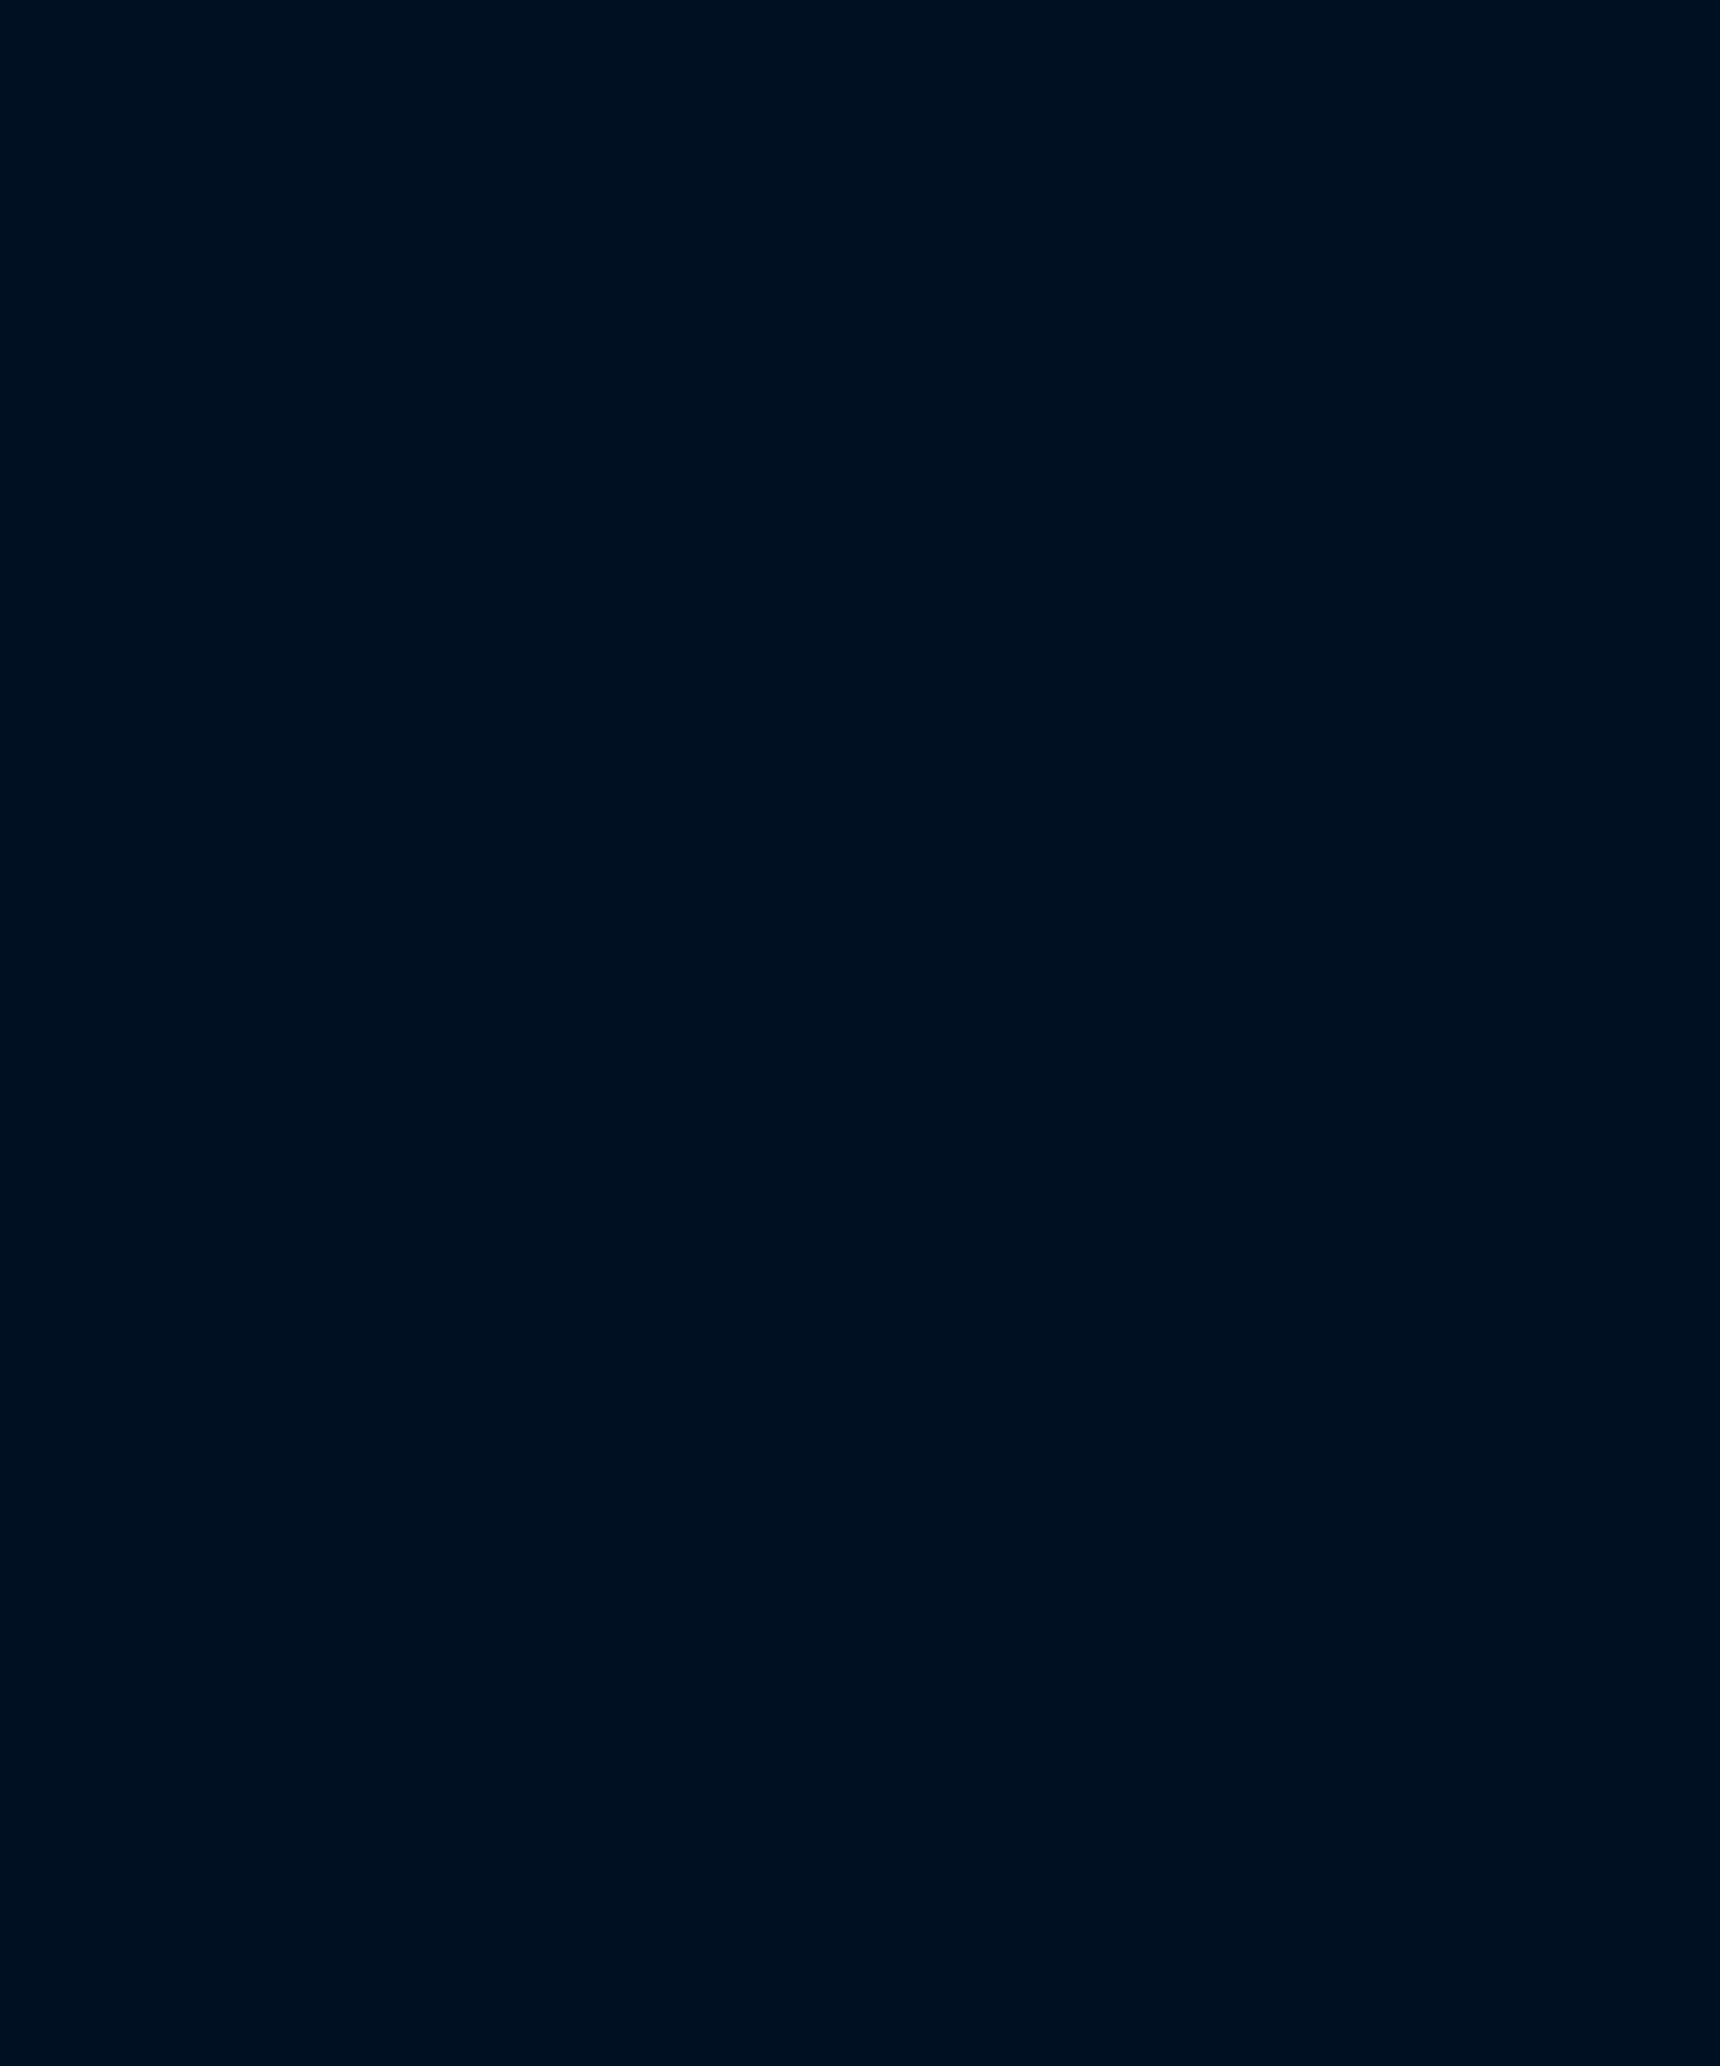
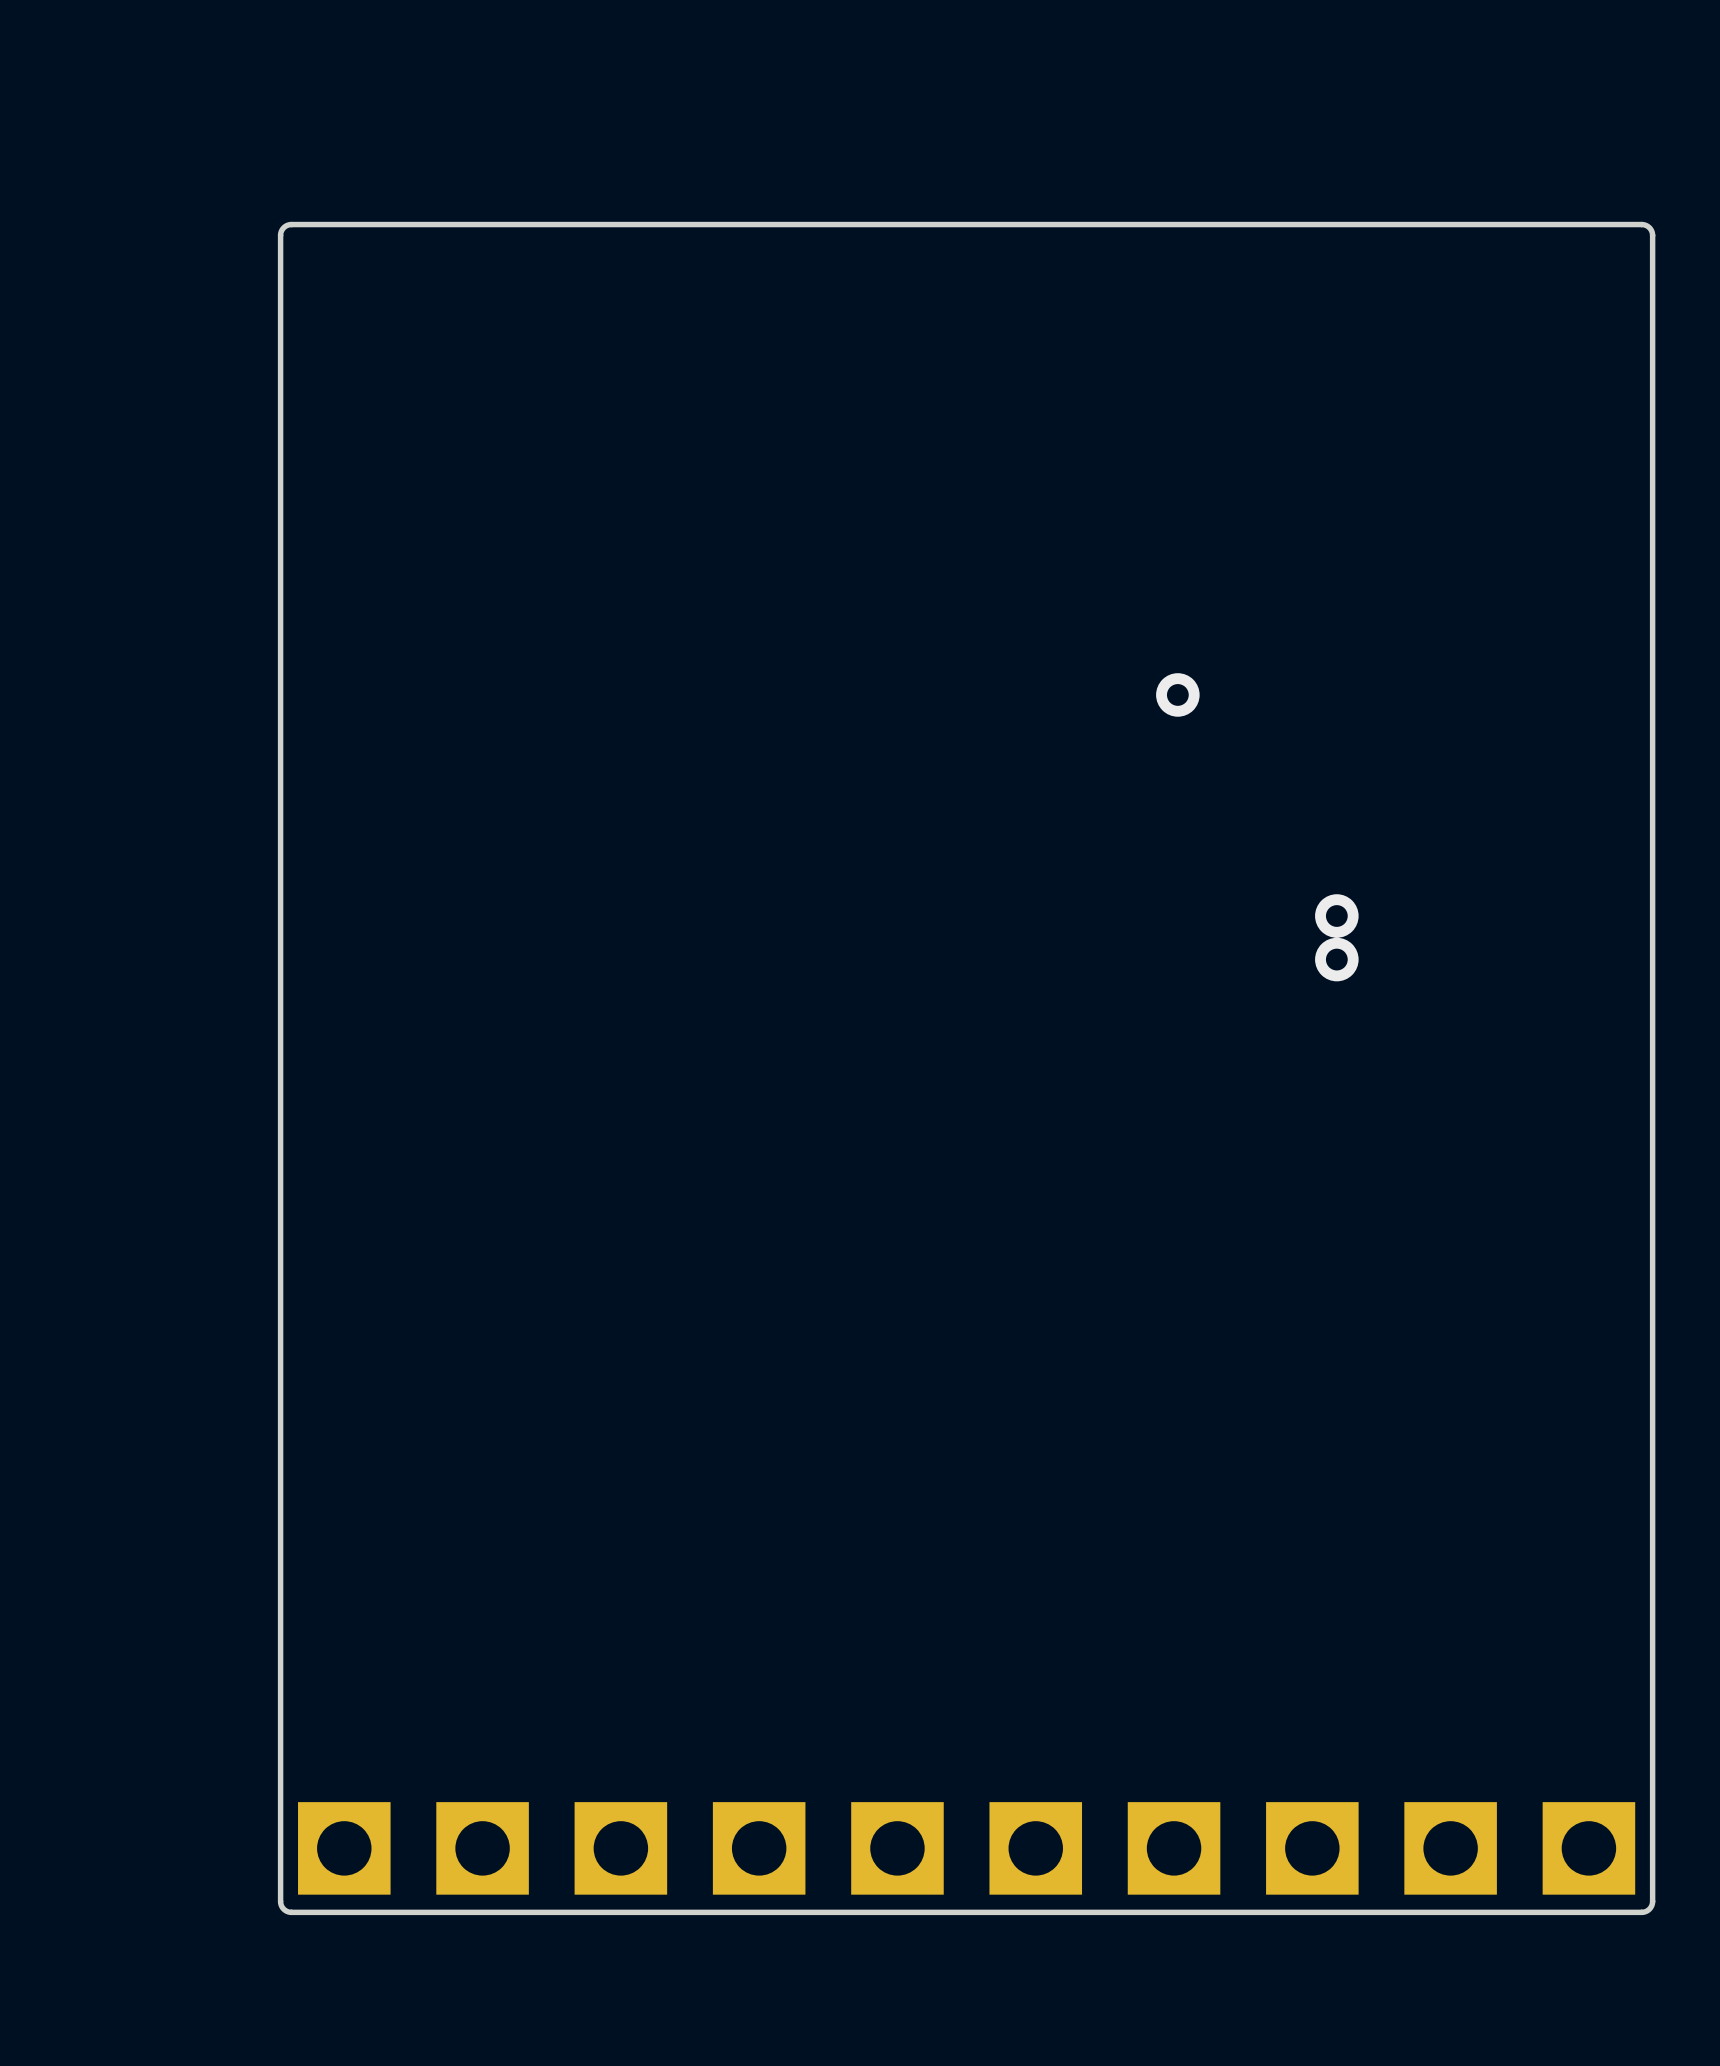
board edge: none -> (1641, 224) (291, 224) (282, 228) (280, 235) (280, 1901) (284, 1910) (291, 1912) (1641, 1912) (1650, 1908) (1652, 1901) (1652, 235) (1649, 227) (1641, 224)
via: none -> (1177, 694)
via: none -> (1336, 916)
via: none -> (1336, 959)
part: none -> (966, 1848)

